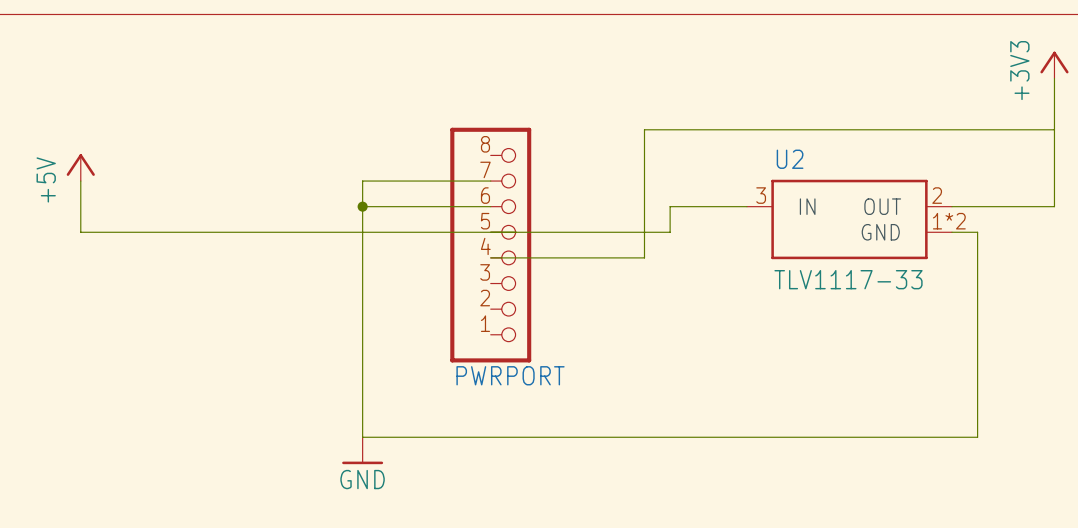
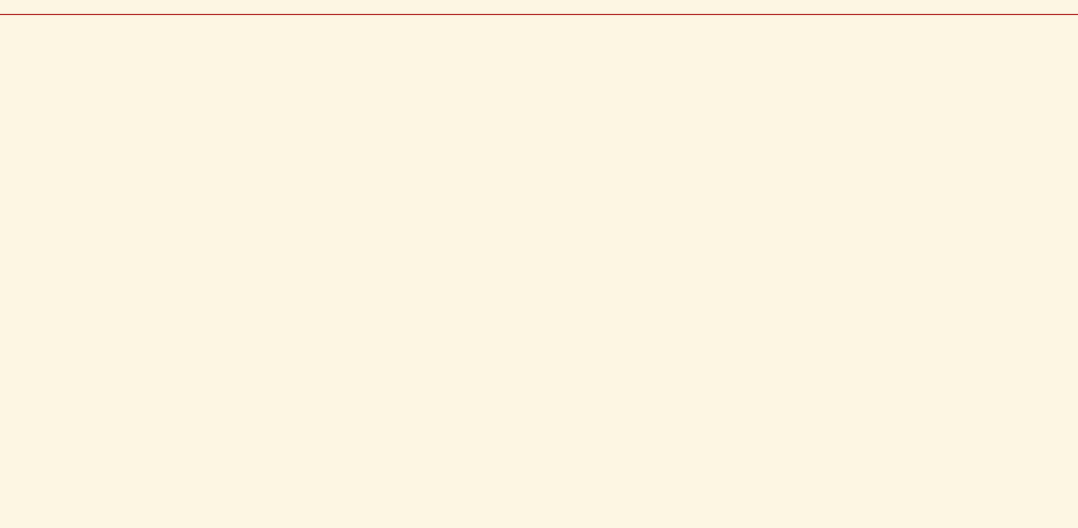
power symbol: +3V3 (1054, 65) -> none
wire: (1054, 78) (1054, 206) (951, 206) -> none
wire: (1054, 129) (644, 129) (644, 257) (490, 257) -> none
power symbol: +5V (80, 167) -> none
wire: (80, 181) (80, 232) (670, 232) (670, 206) (746, 206) -> none
wire: (490, 181) (362, 181) (362, 437) (977, 437) (977, 232) (951, 232) -> none
wire: (362, 206) (490, 206) -> none
junction: (362, 206) -> none
U2: TLV1117-33 (849, 219) -> none
PWRPORT: (490, 245) -> none
power symbol: GND (362, 450) -> none

